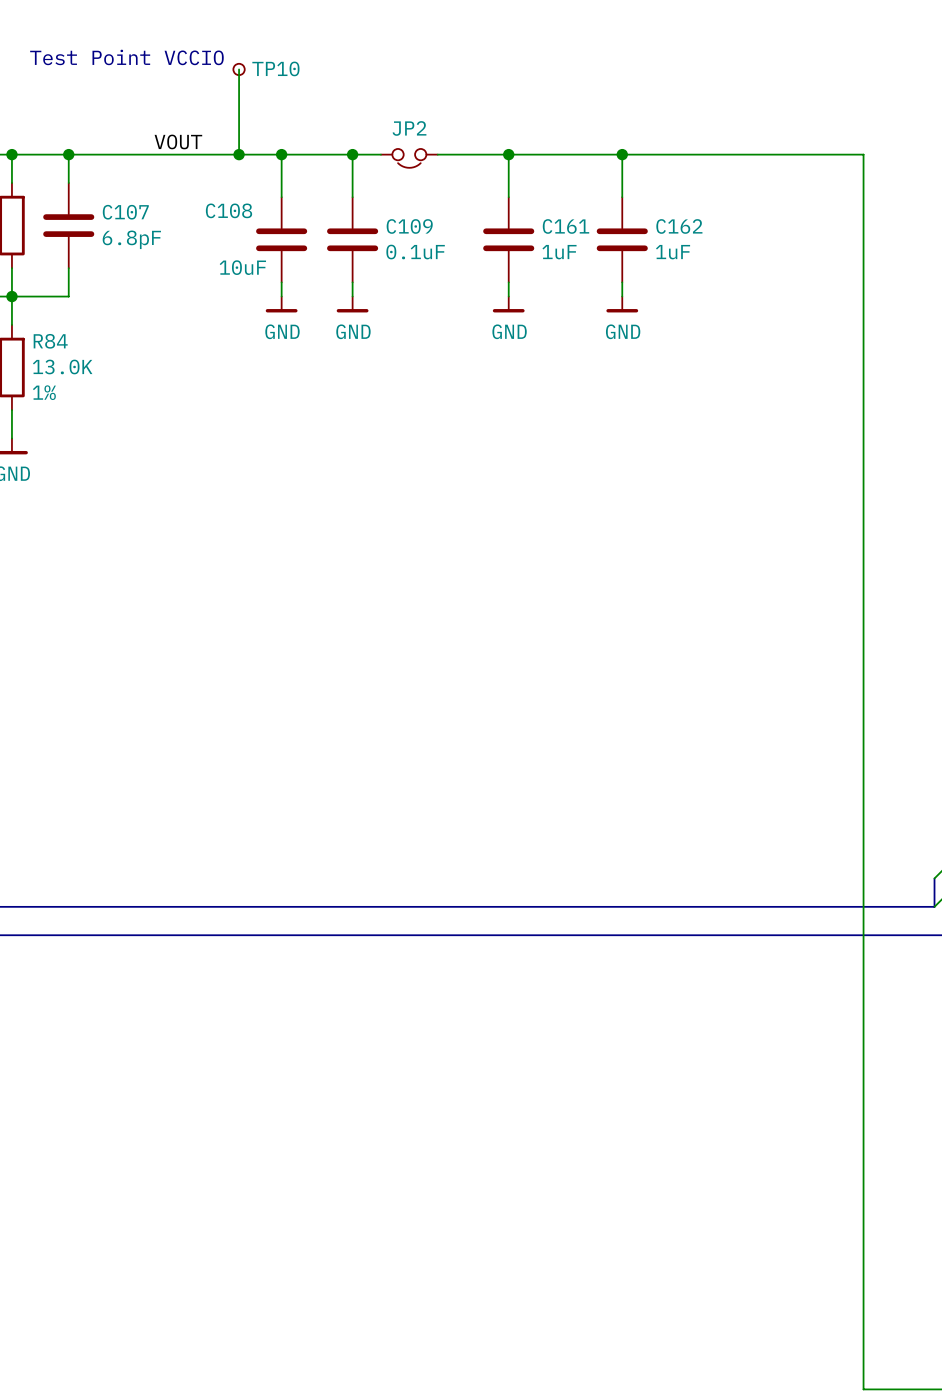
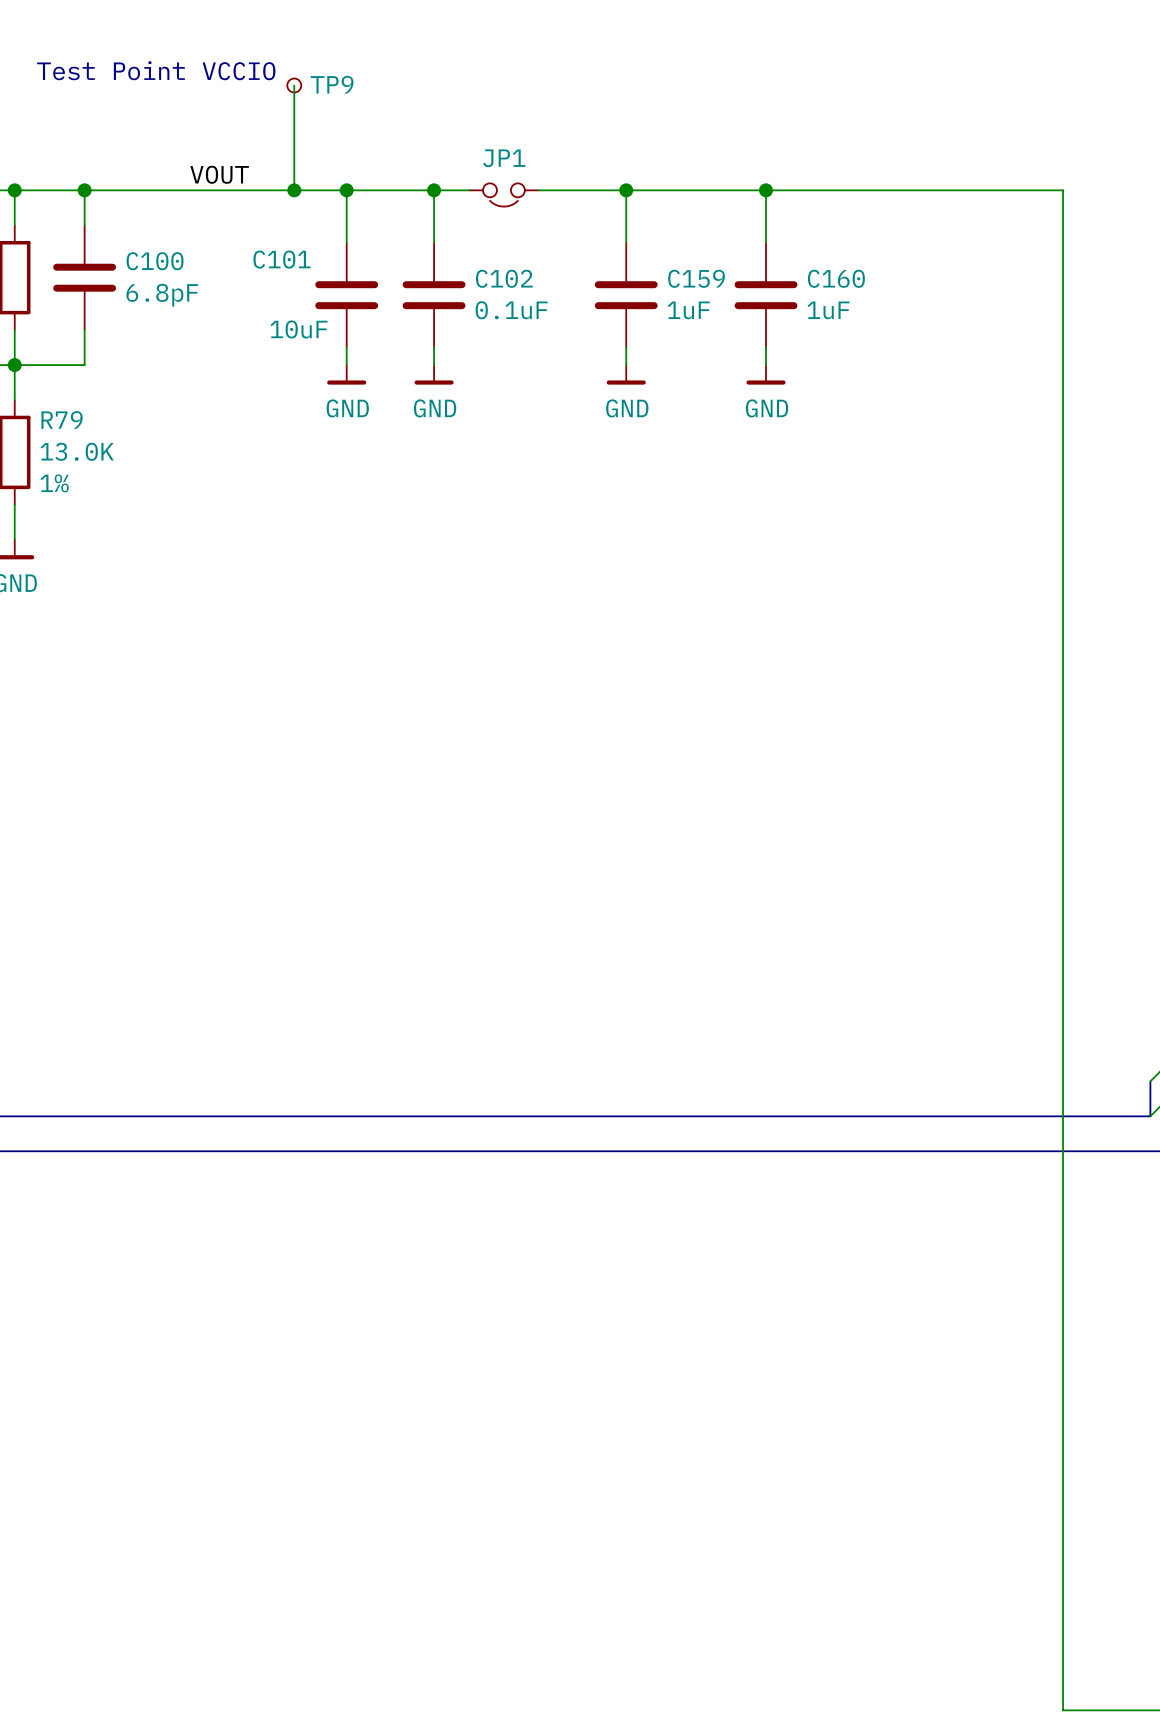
TP10 name: TP10 (275, 68) -> TP9 (332, 84)
JP2 name: JP2 (409, 128) -> JP1 (504, 158)
C108 name: C108 (229, 210) -> C101 (282, 259)
C107 name: C107 (125, 212) -> C100 (155, 261)
C109 name: C109 (409, 226) -> C102 (504, 278)
C161 name: C161 (566, 226) -> C159 (696, 278)
C162 name: C162 (679, 226) -> C160 (836, 278)
R84 name: R84 (50, 341) -> R79 (62, 419)

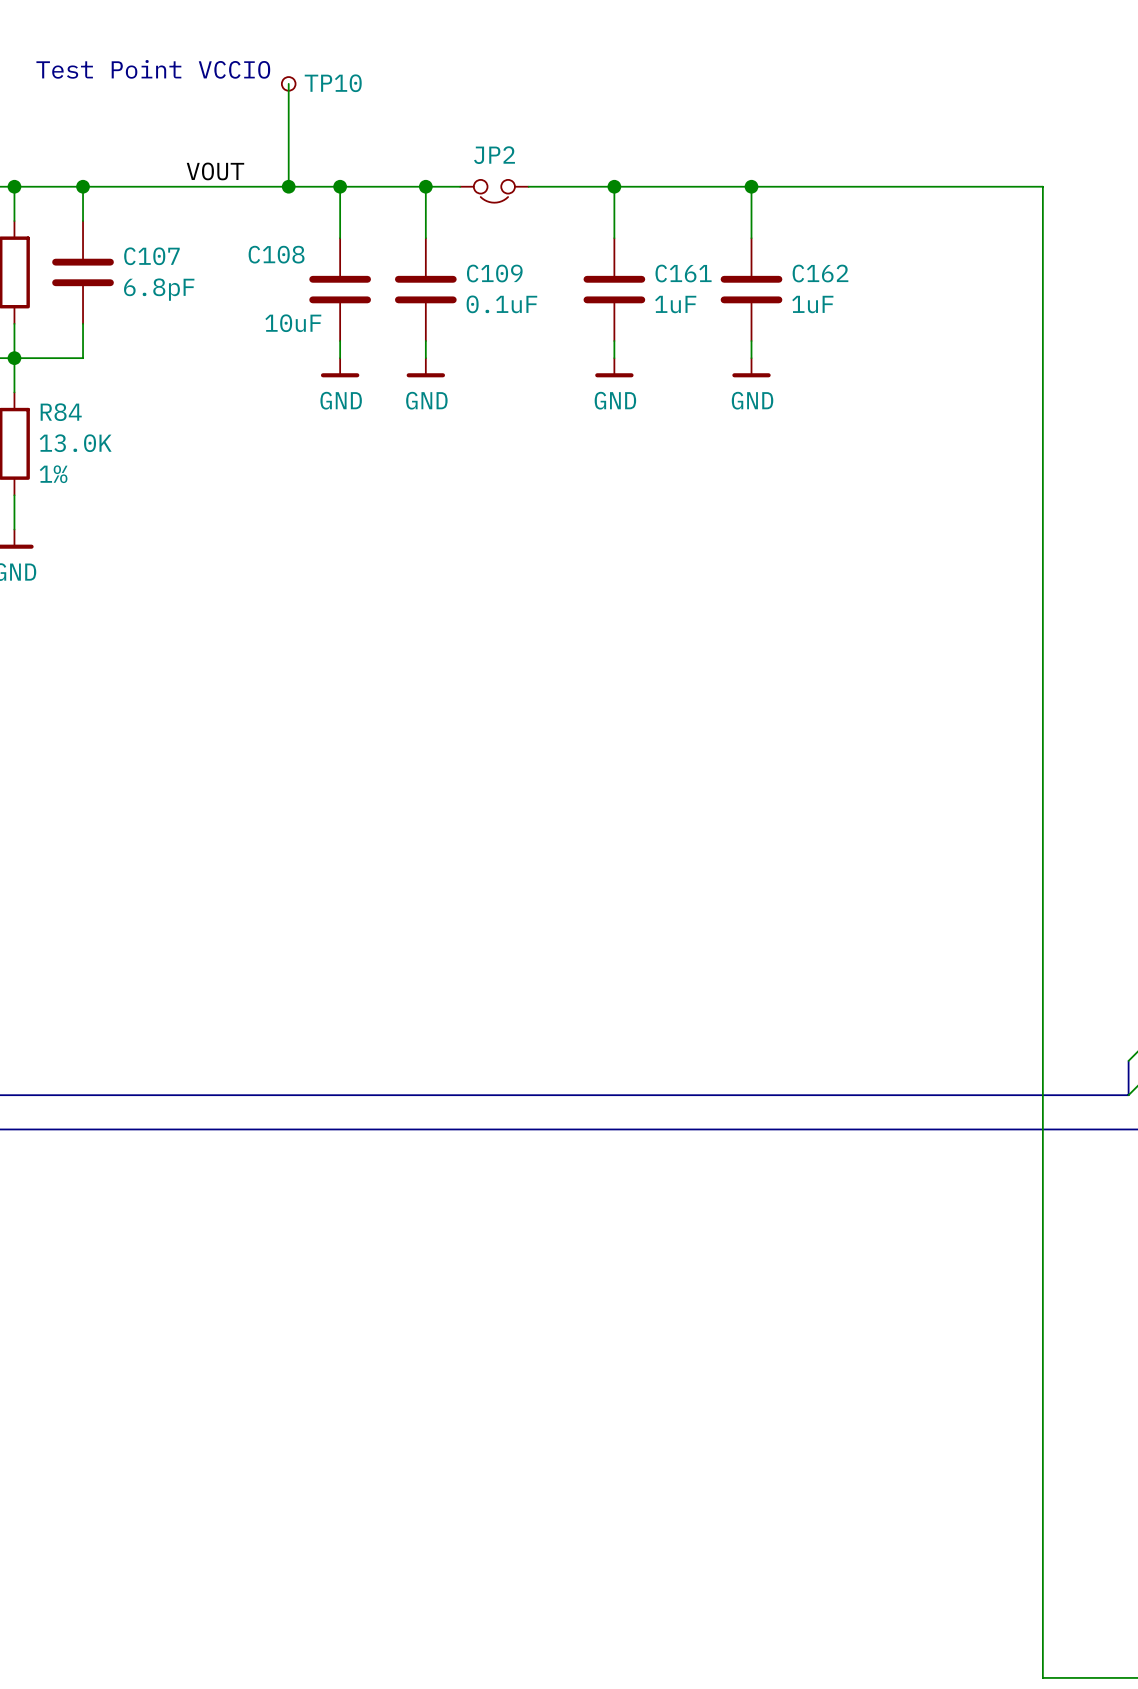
TP9 name: TP9 (332, 84) -> TP10 (333, 83)
JP1 name: JP1 (504, 158) -> JP2 (494, 155)
C101 name: C101 (282, 259) -> C108 (276, 254)
C100 name: C100 (155, 261) -> C107 (151, 256)
C102 name: C102 (504, 278) -> C109 (494, 273)
C159 name: C159 (696, 278) -> C161 (683, 273)
C160 name: C160 (836, 278) -> C162 (820, 273)
R79 name: R79 (62, 419) -> R84 (61, 412)

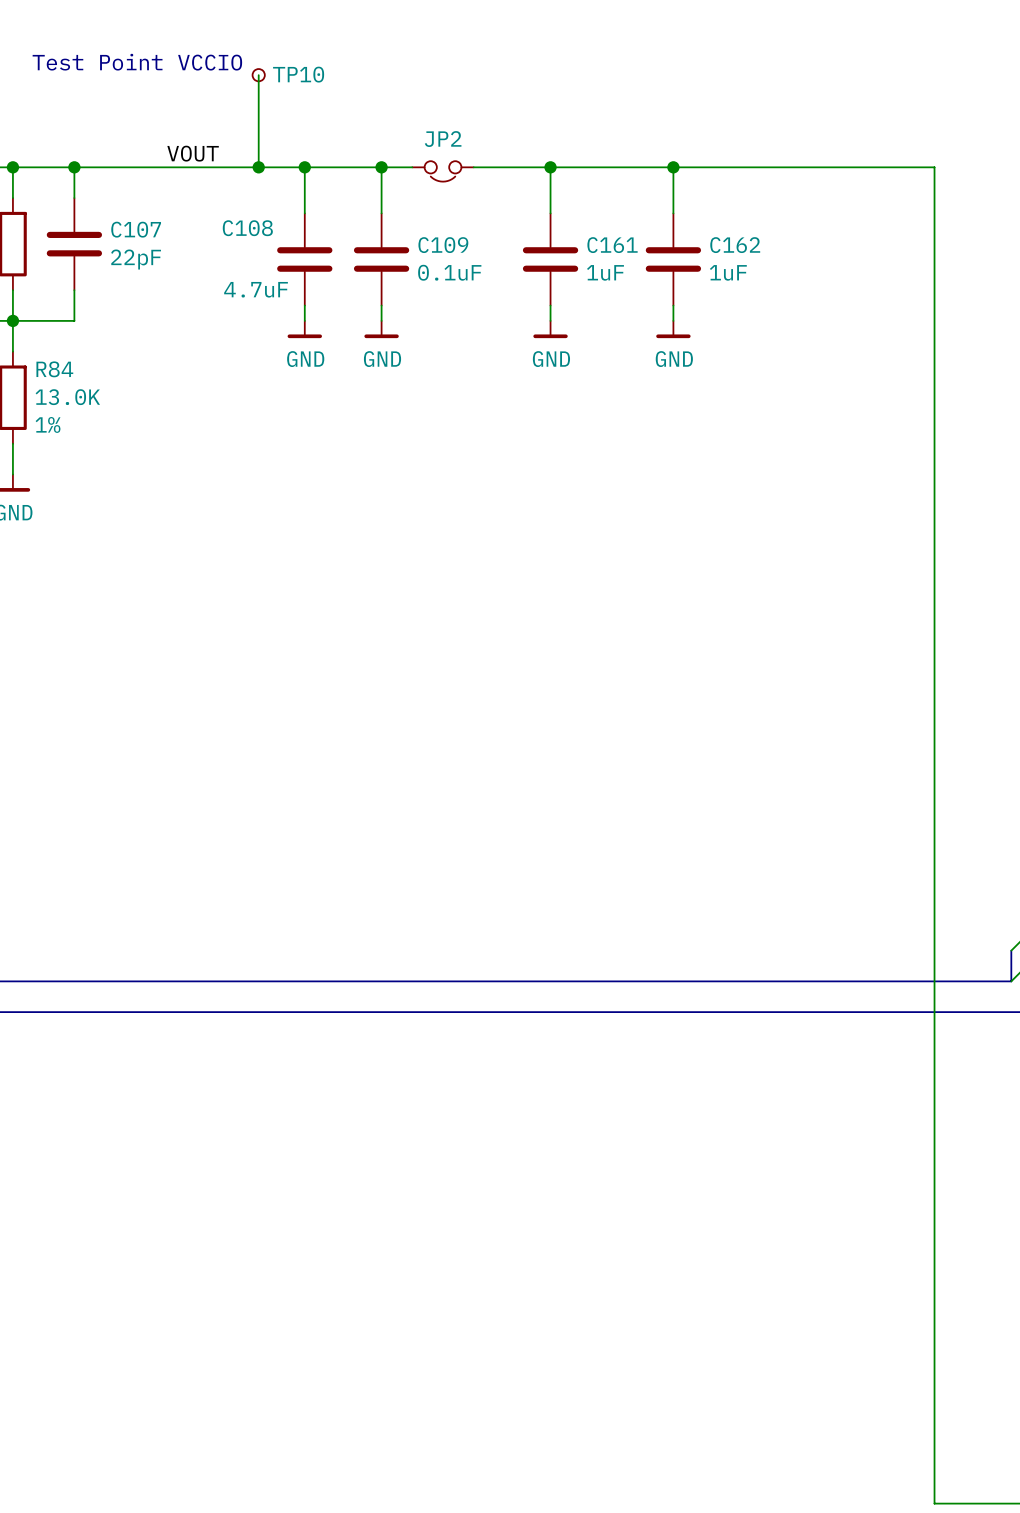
C107 value: 6.8pF (159, 289) -> 22pF (136, 259)
C108 value: 10uF (293, 323) -> 4.7uF (256, 289)

